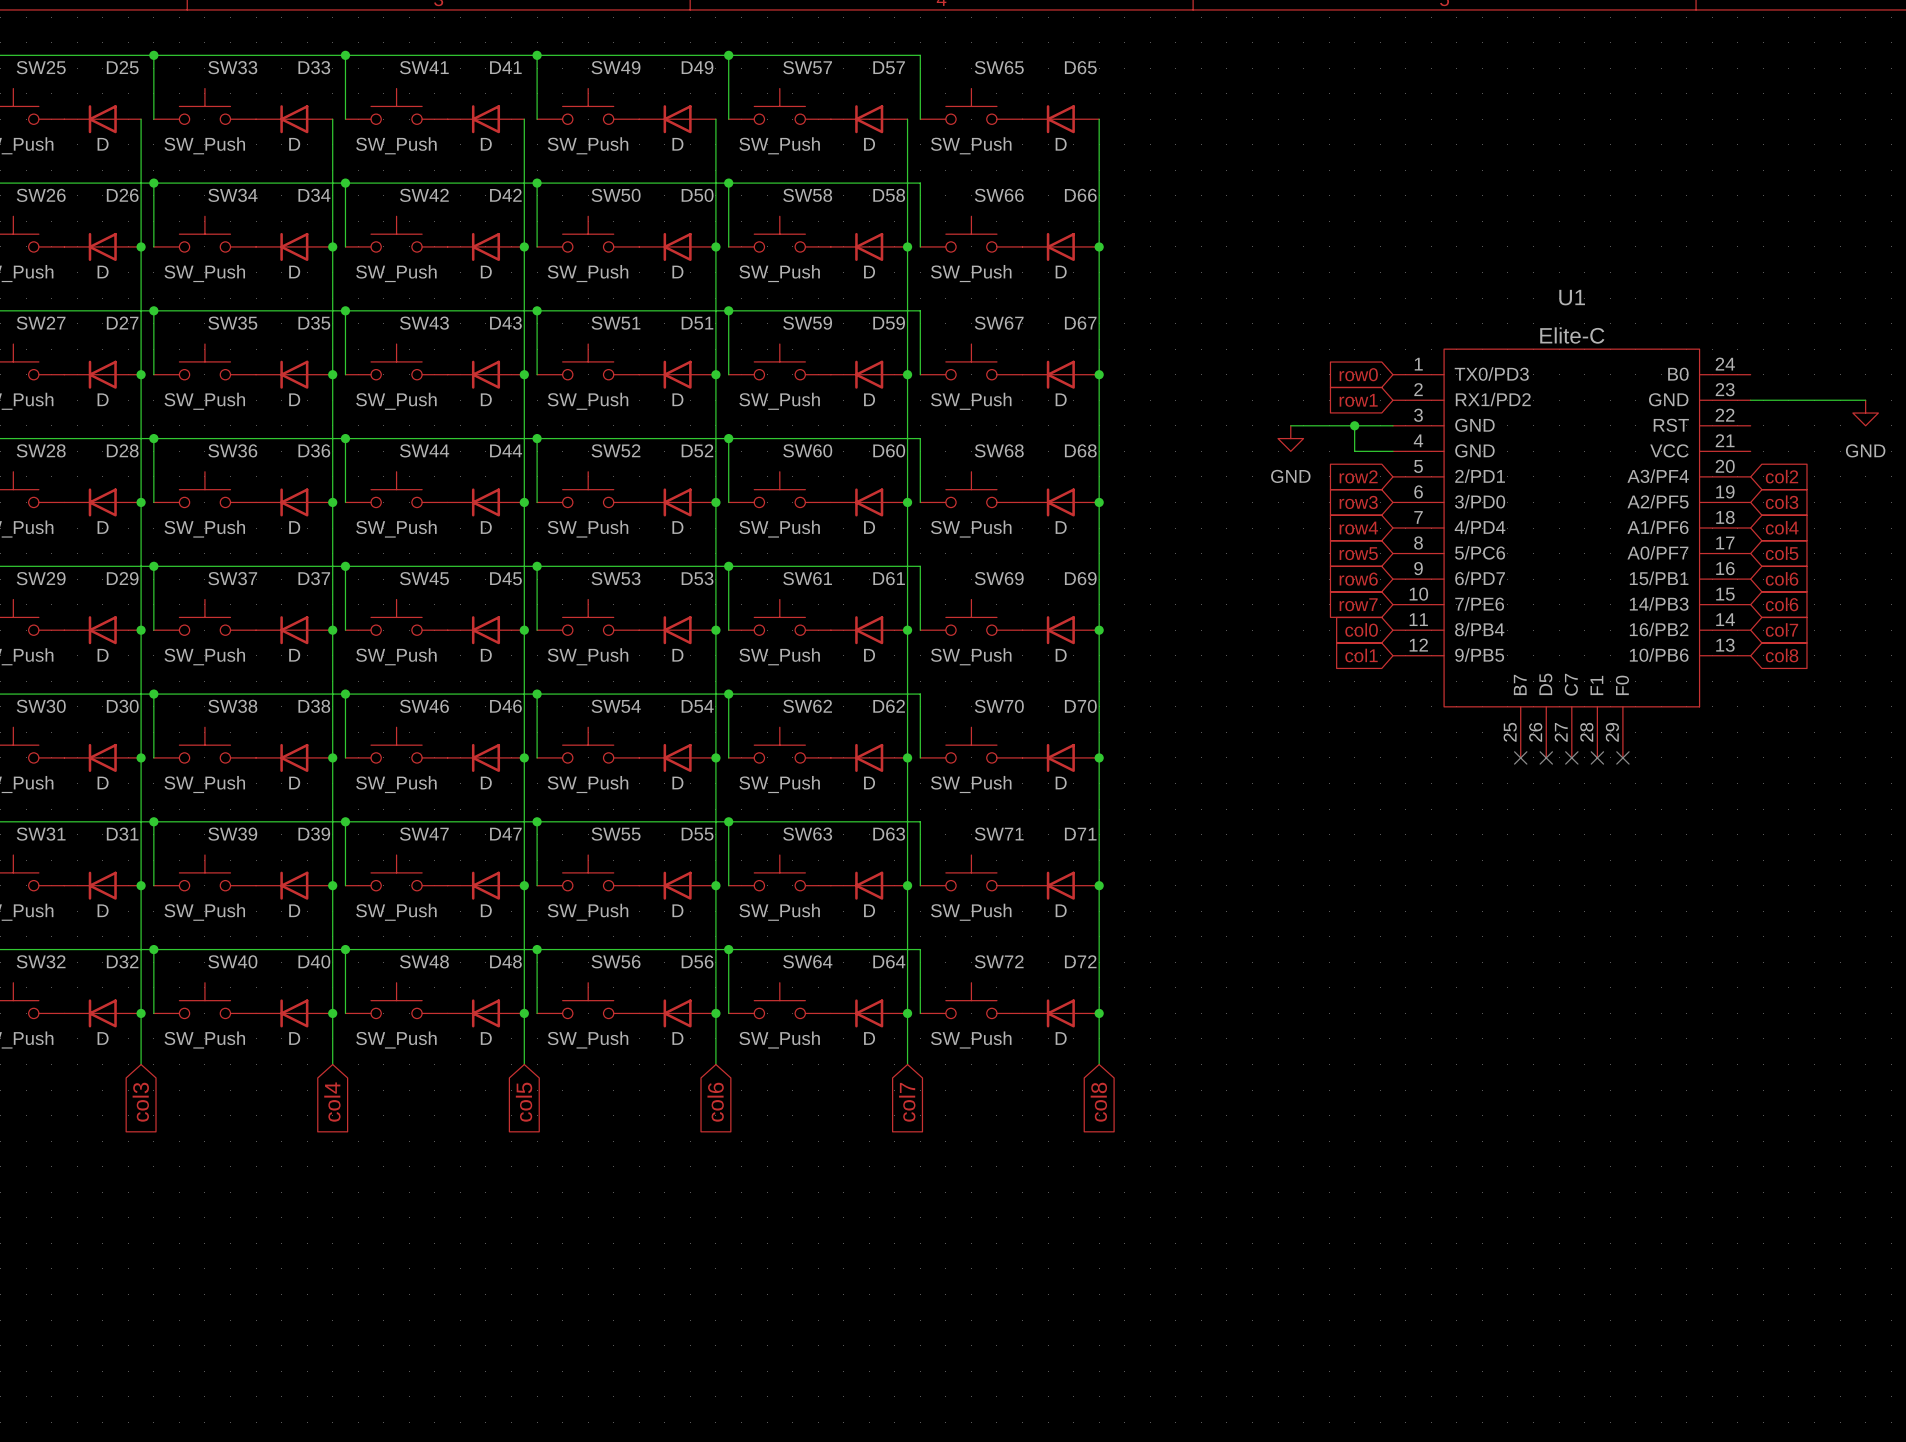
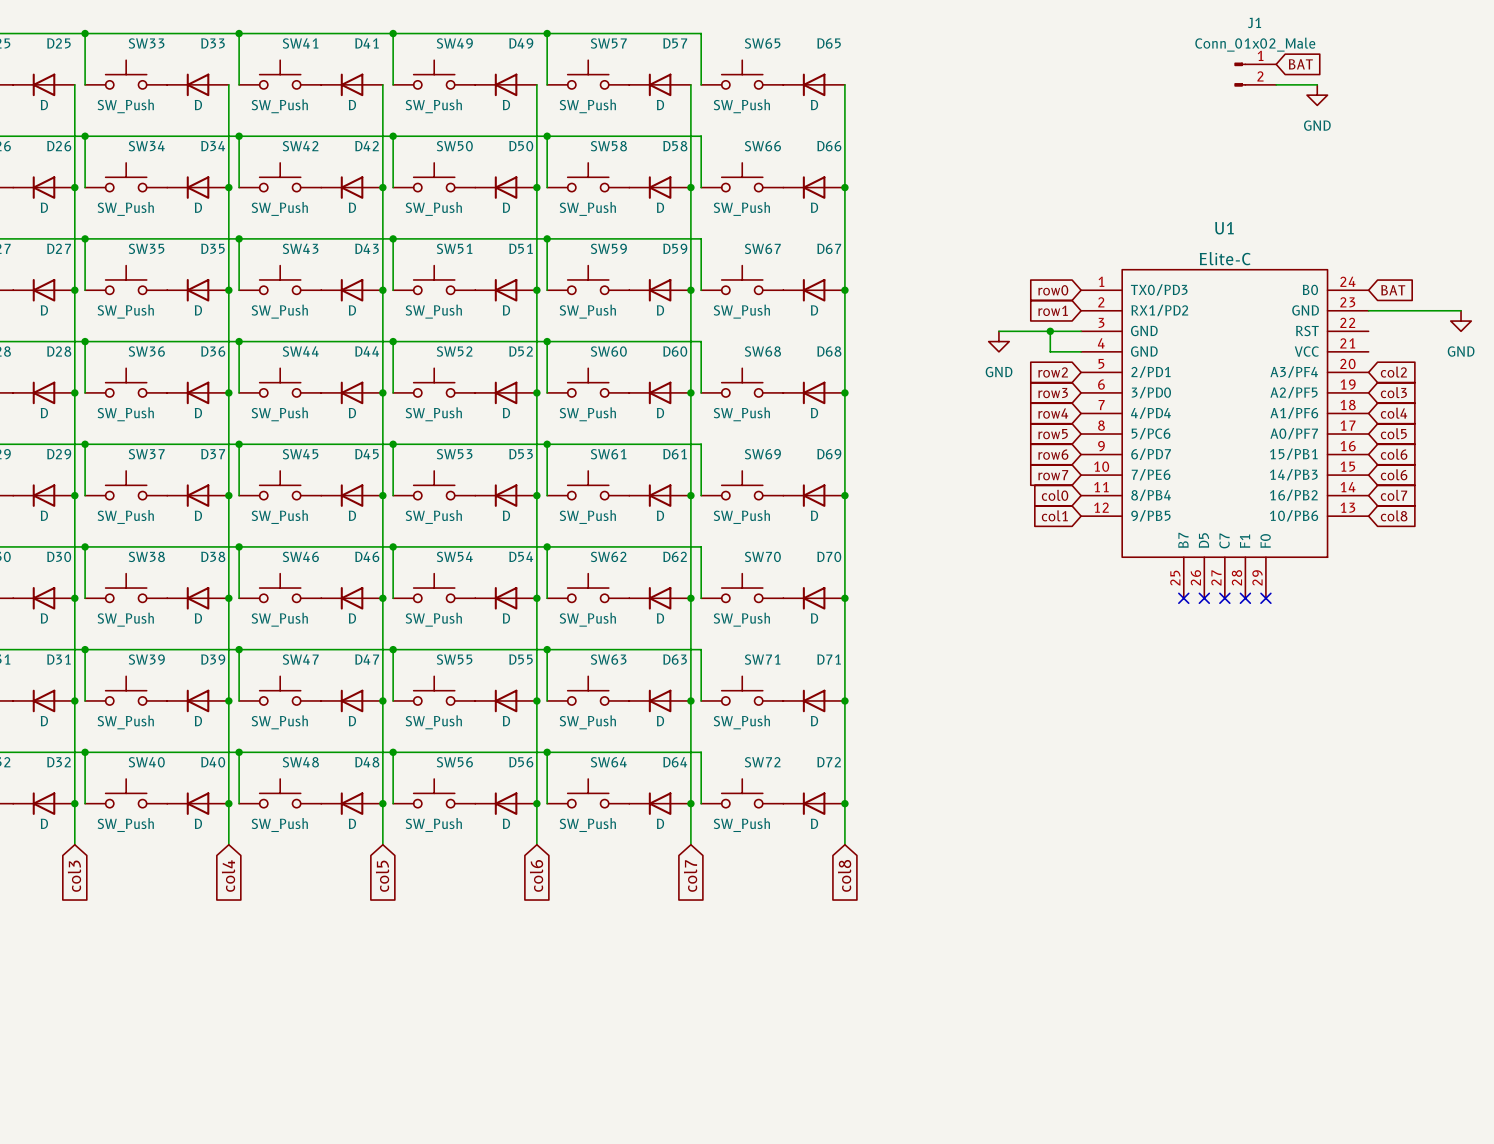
global label: none -> BAT (1300, 64)
J1: none -> Conn_01x02_Male (1255, 74)
wire: none -> (1276, 84) (1317, 84)
power symbol: none -> GND (1317, 95)
global label: none -> BAT (1393, 290)

